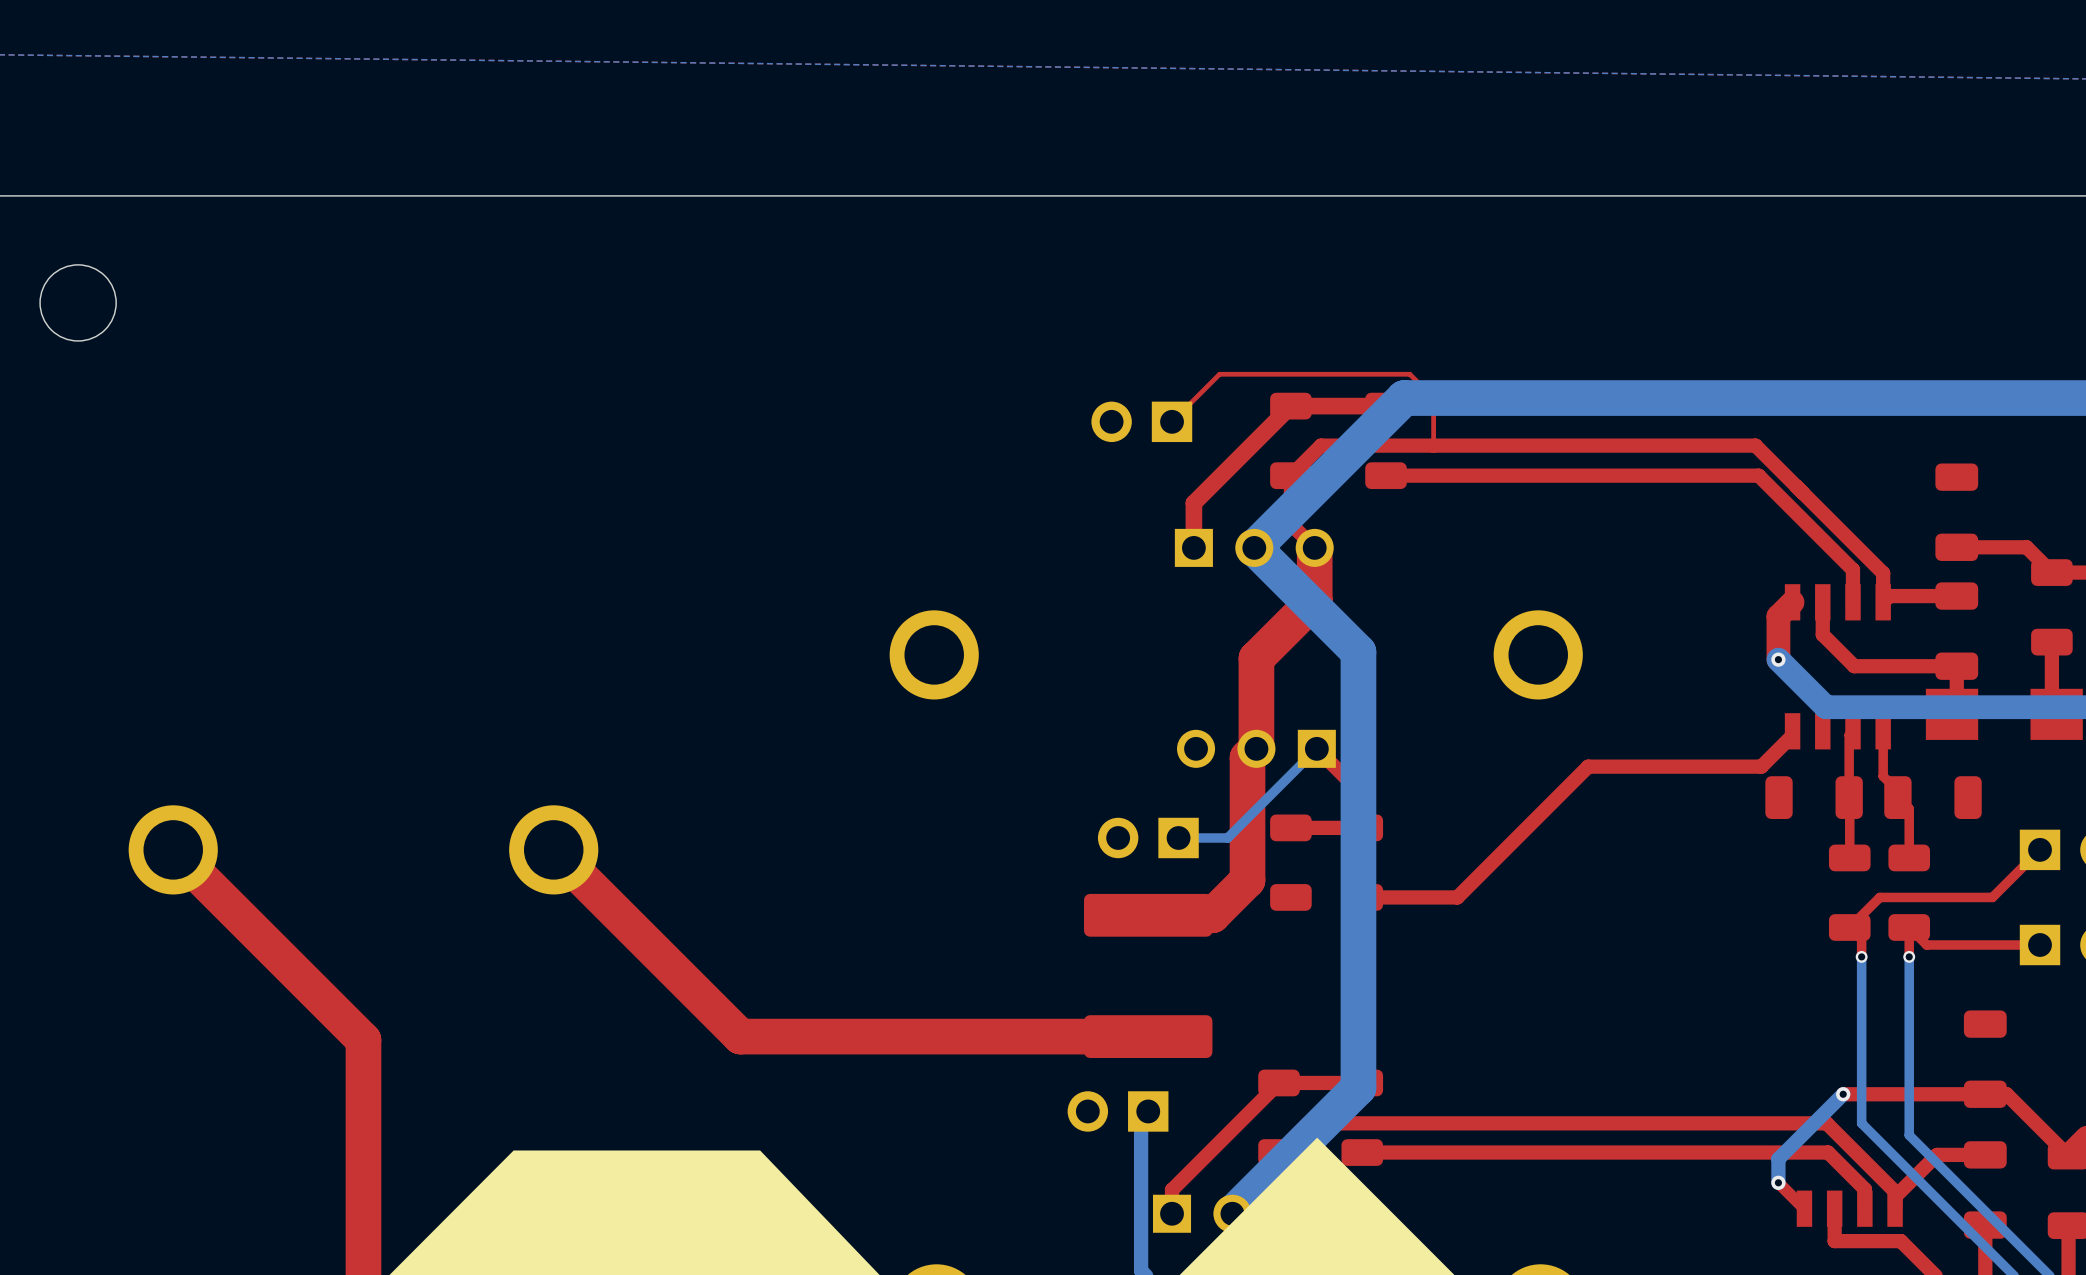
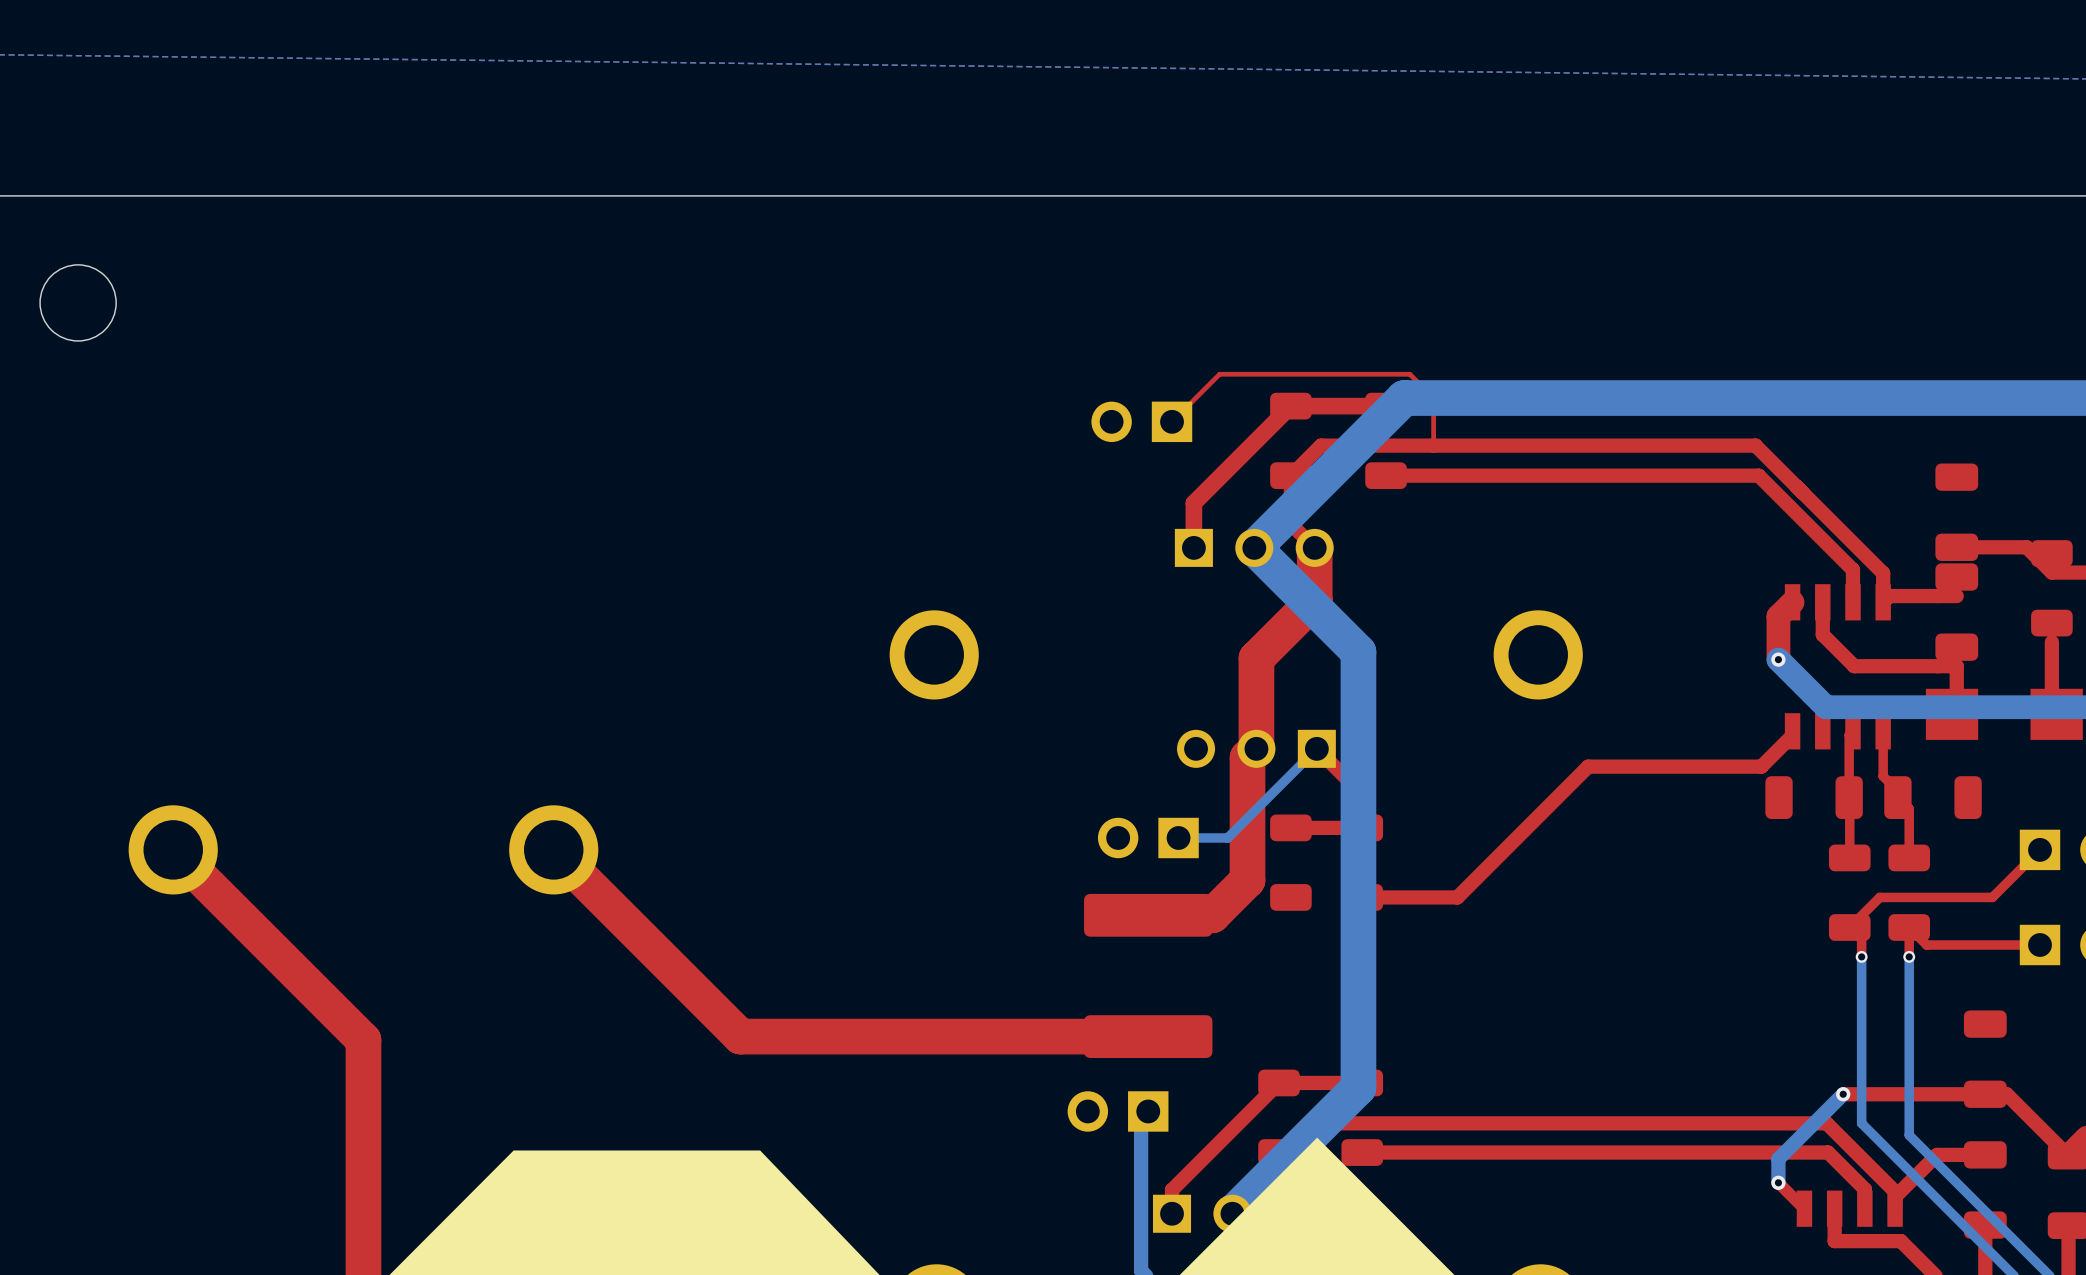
part position: (2051, 607) -> (2051, 588)
part position: (1956, 631) -> (1956, 612)

